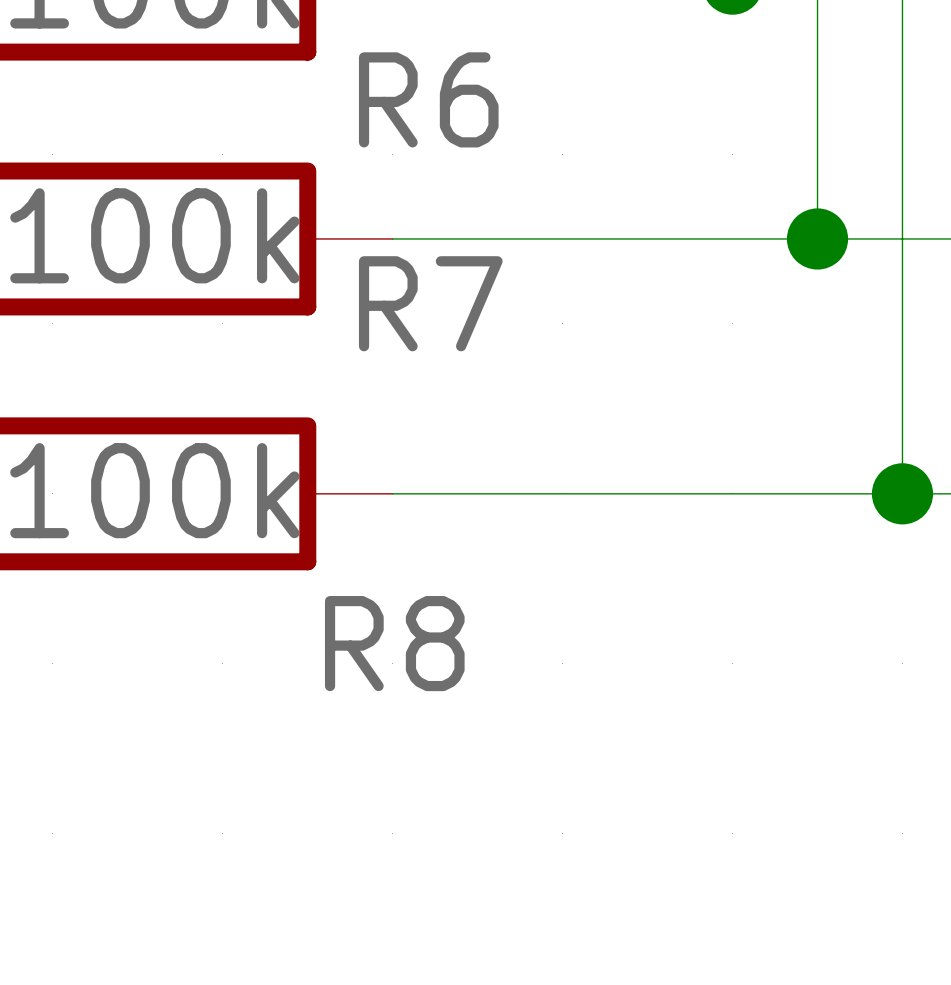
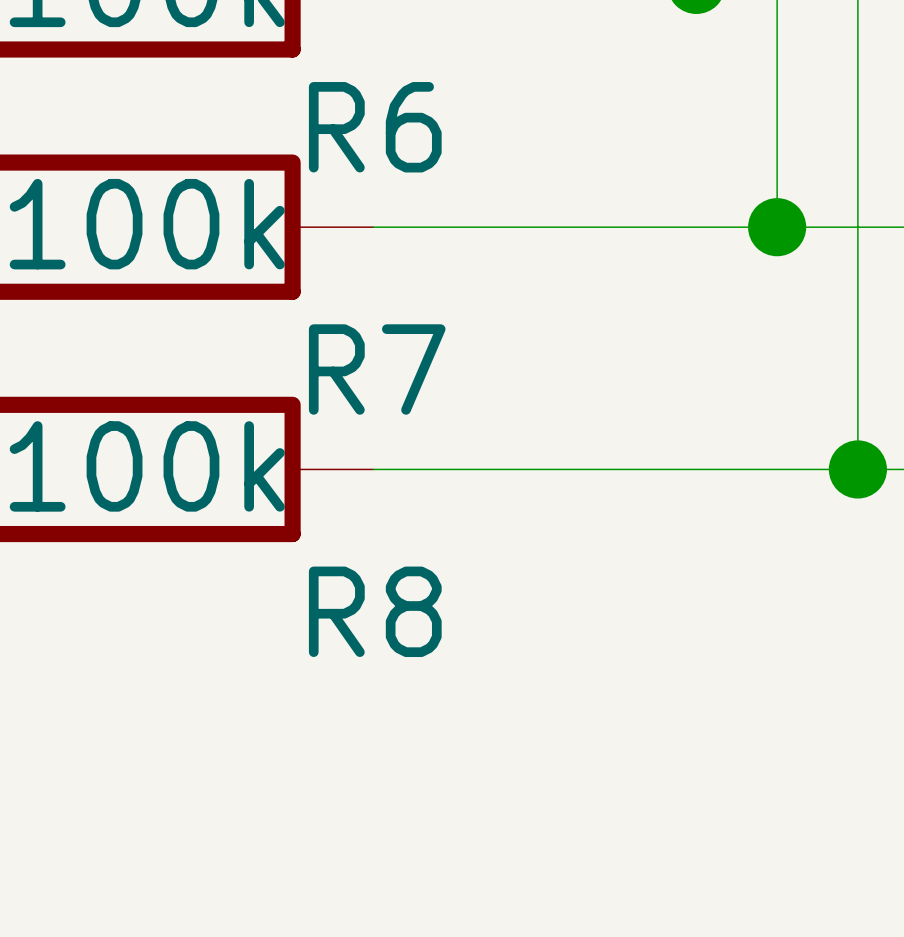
R6 name position: R6 (428, 99) -> R6 (375, 127)
R7 name position: R7 (430, 303) -> R7 (377, 369)

